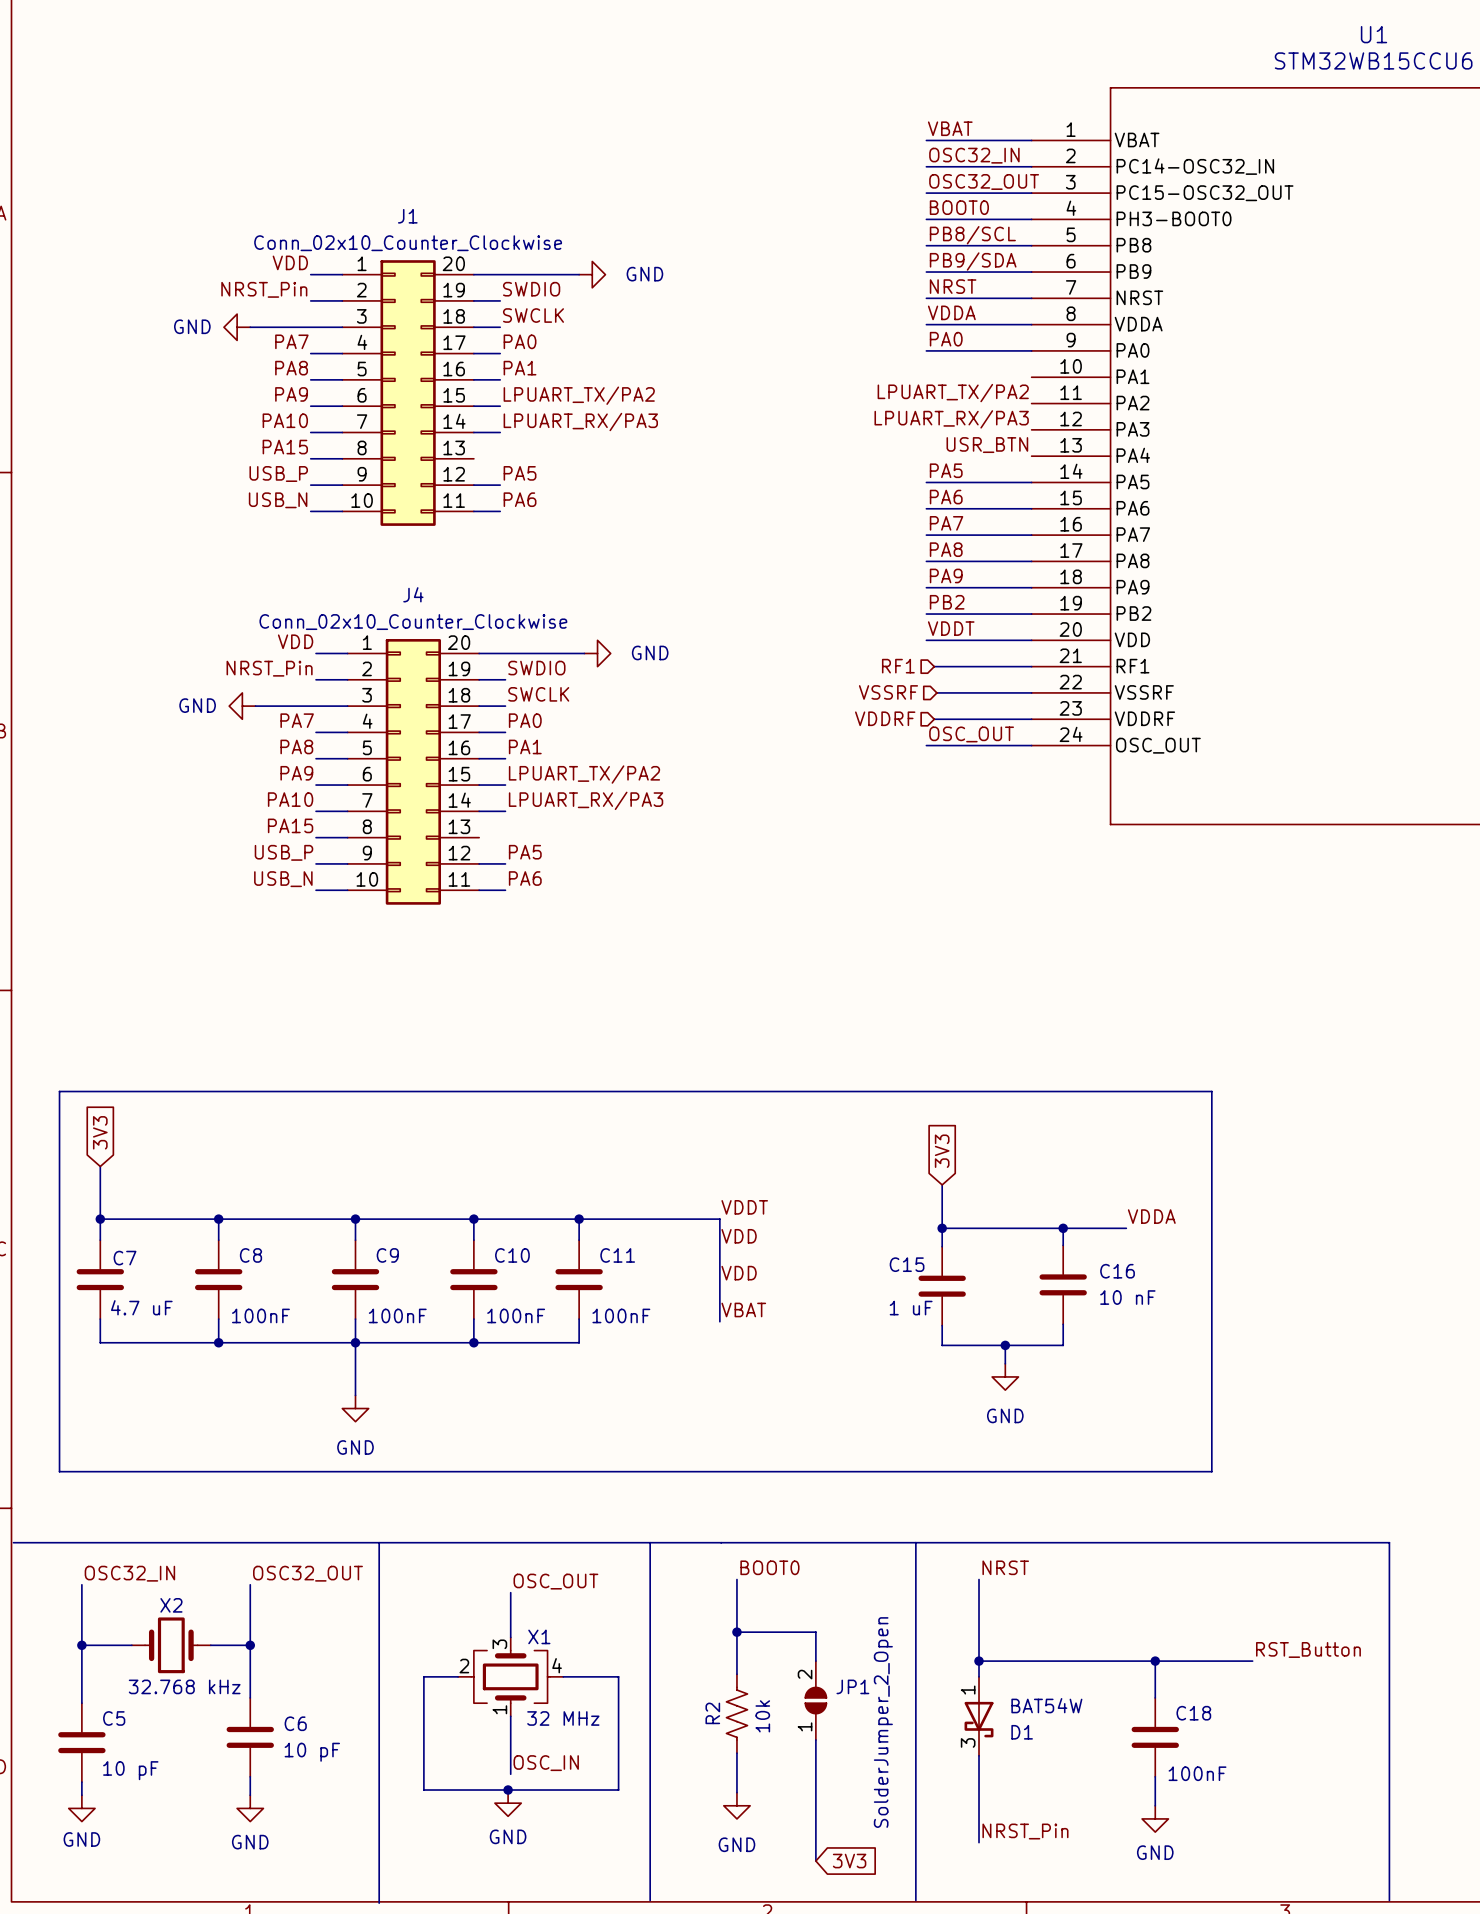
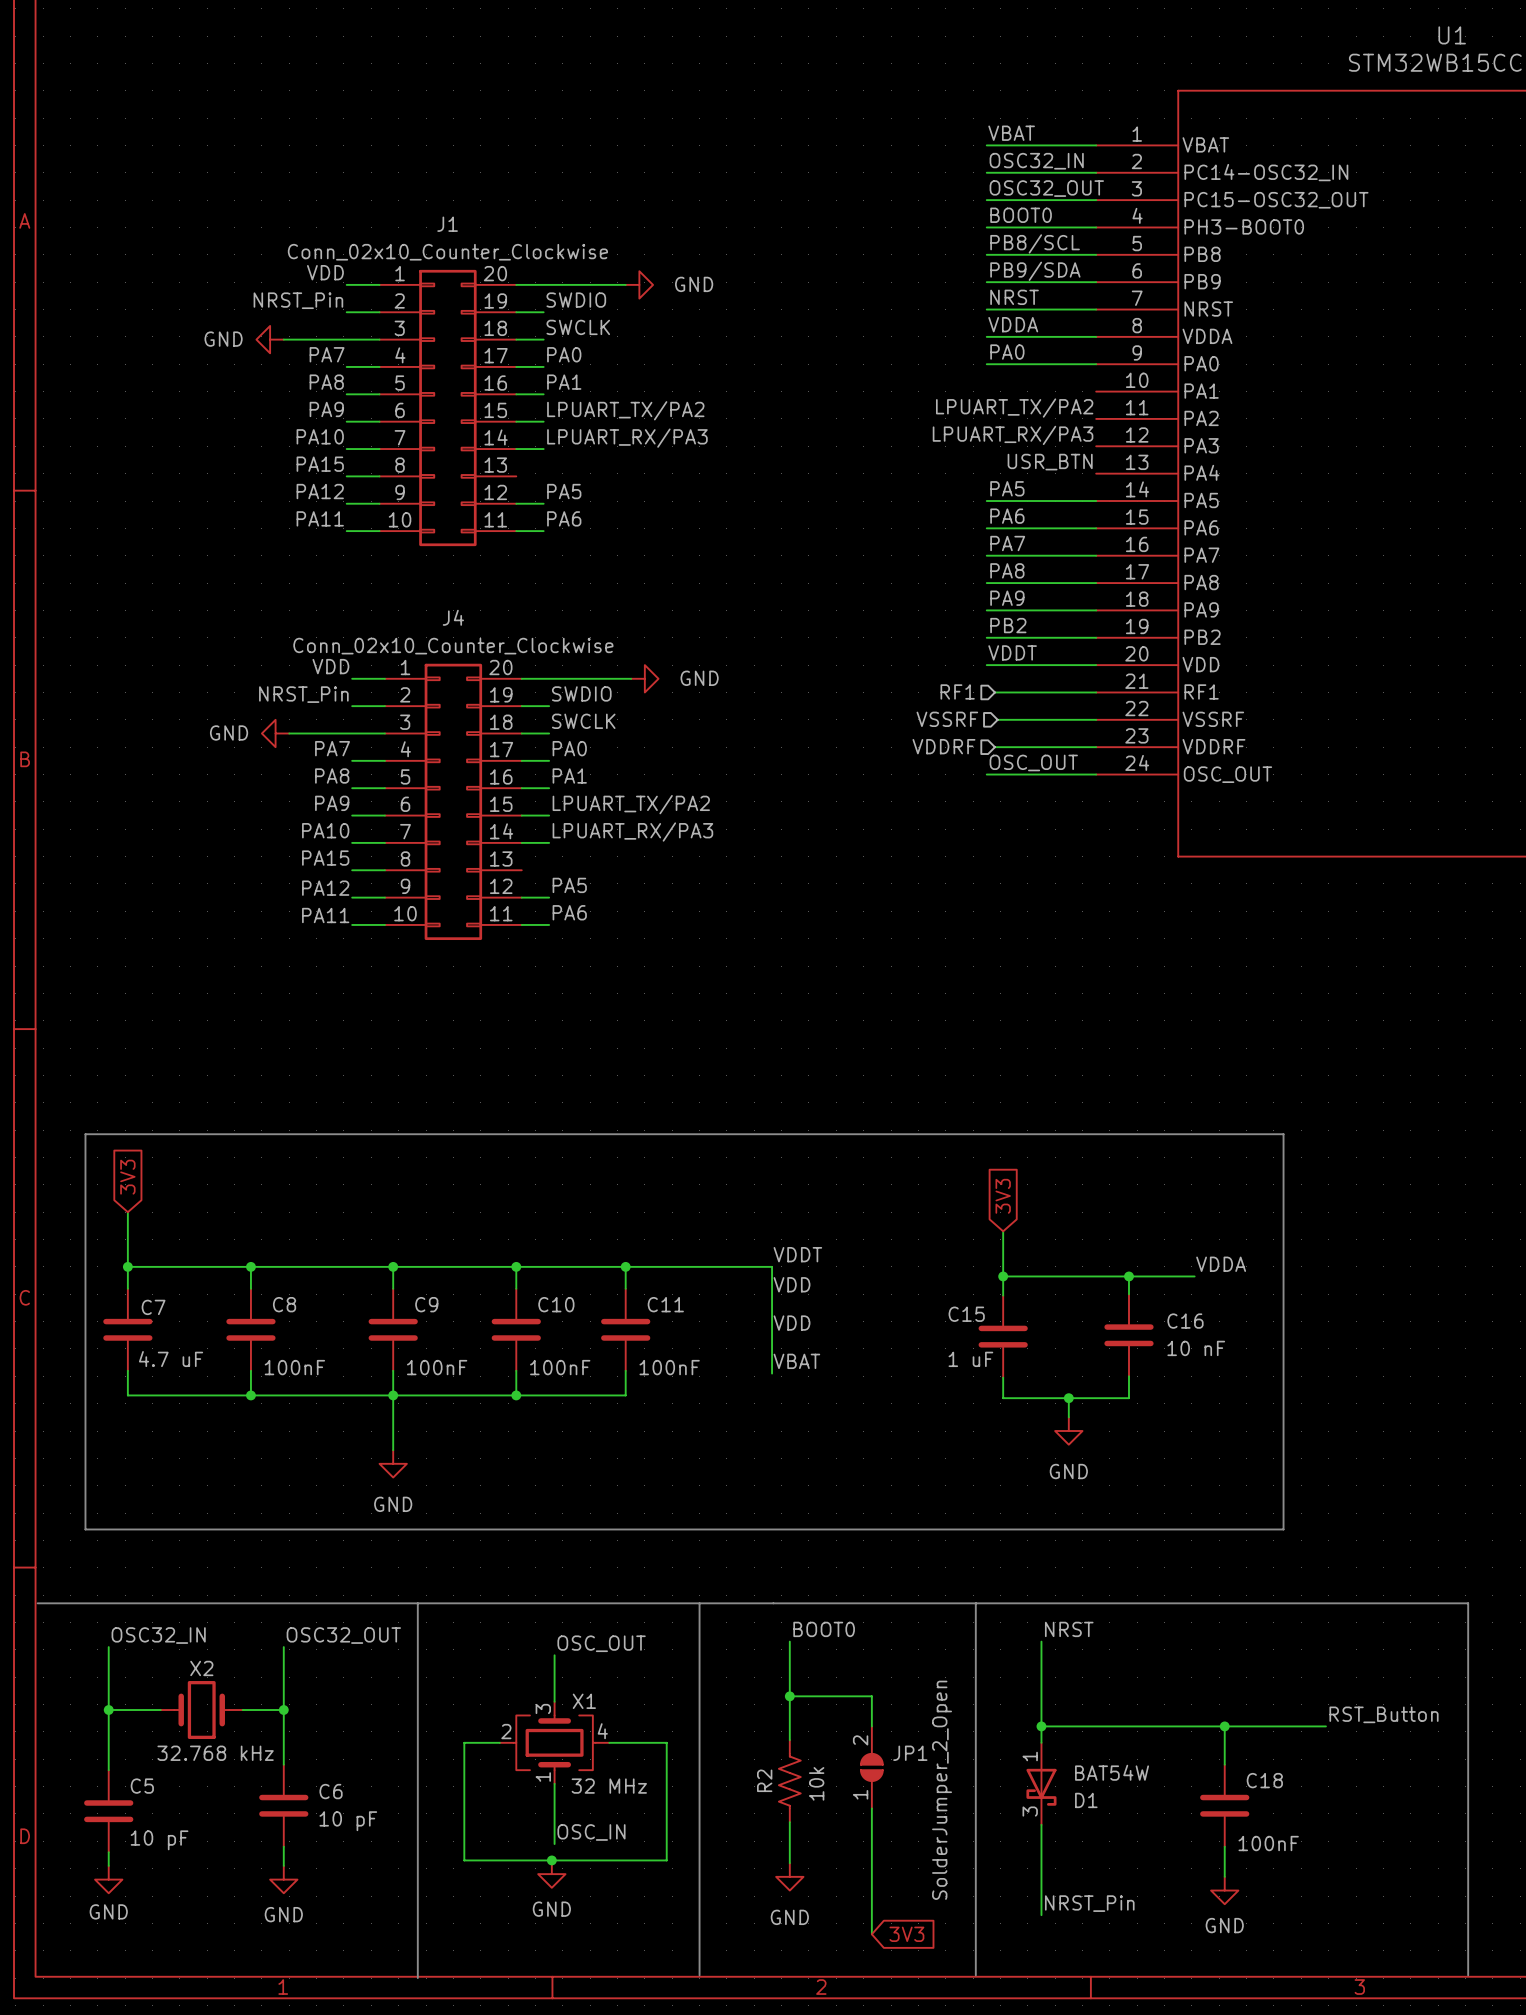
label: USB_P (278, 474) -> PA12 (320, 491)
label: USB_N (278, 500) -> PA11 (320, 518)
label: USB_P (283, 852) -> PA12 (325, 888)
label: USB_N (283, 879) -> PA11 (325, 915)

